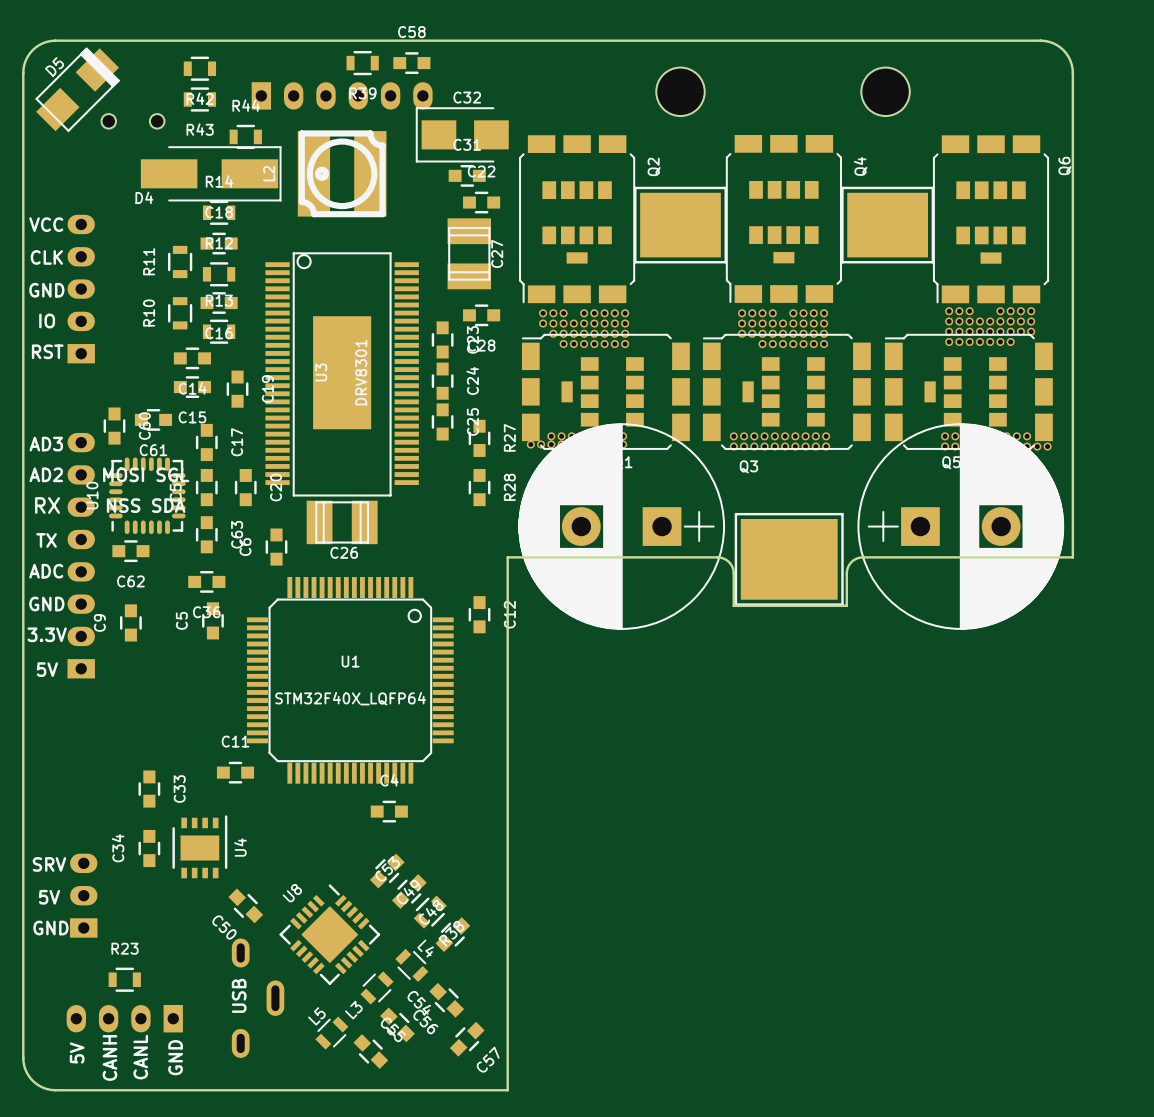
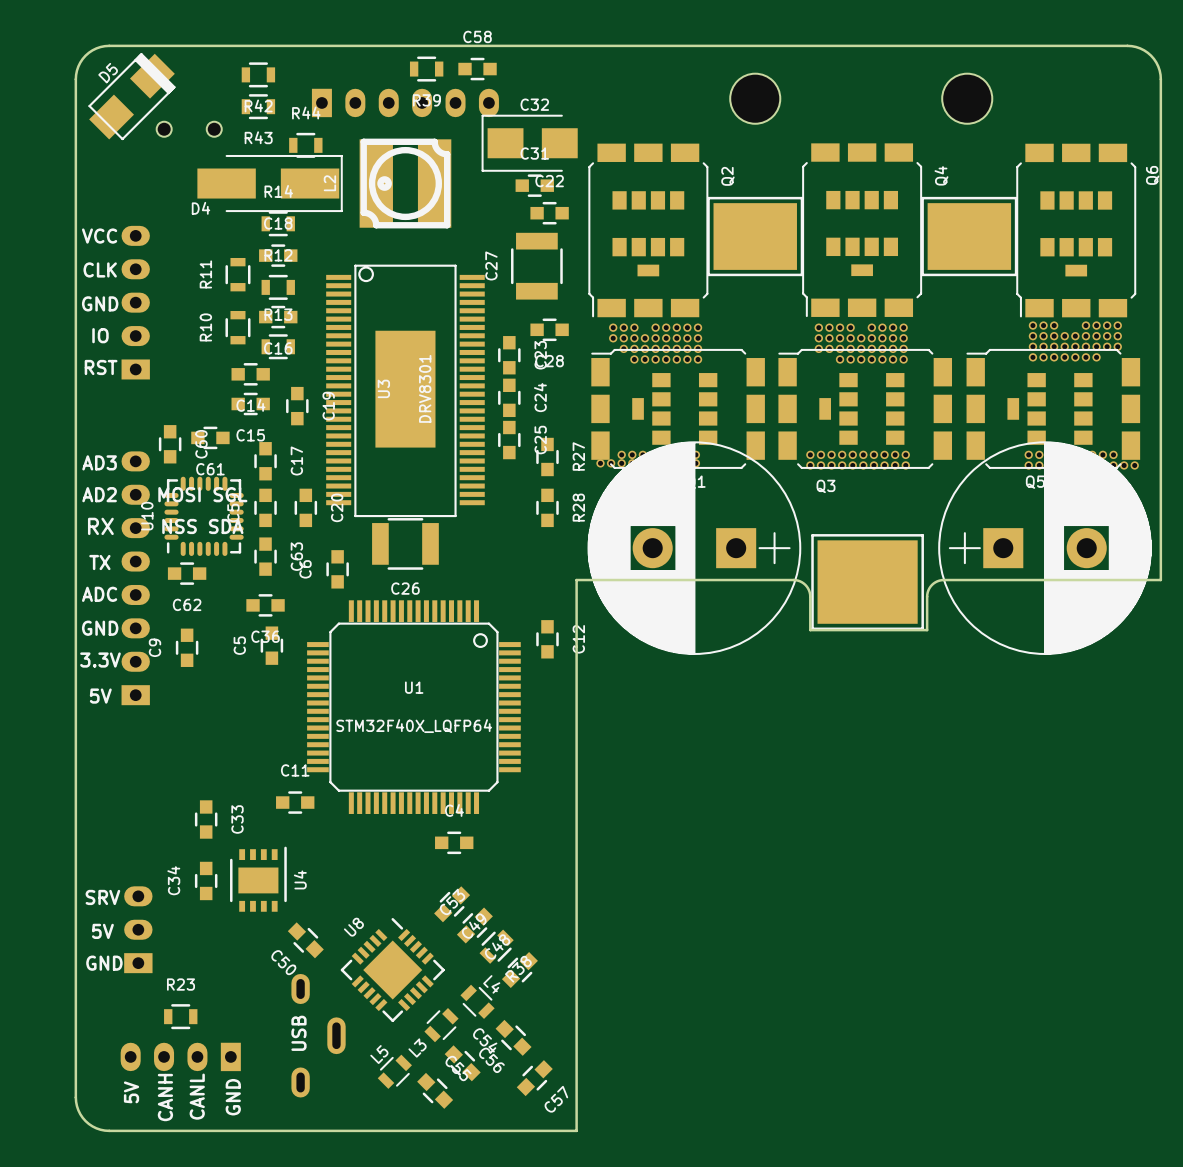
C27 footprint: [447, 218, 492, 290] -> [511, 232, 563, 300]
C27 name position: C27 (497, 253) -> C27 (491, 265)
C26 footprint: [306, 500, 378, 545] -> [372, 518, 439, 570]

